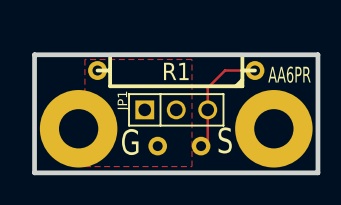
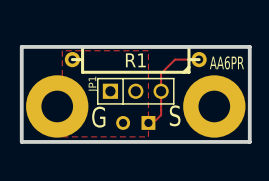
part footprint: [148, 136, 211, 156] -> [116, 115, 156, 130]

